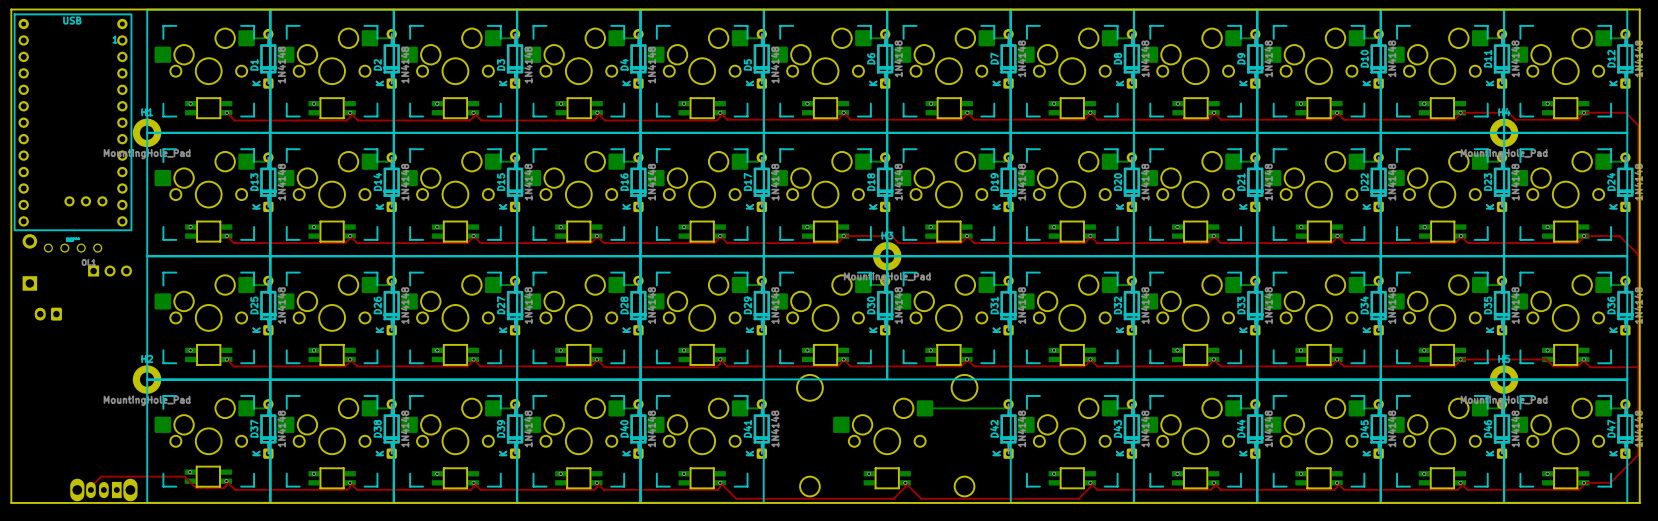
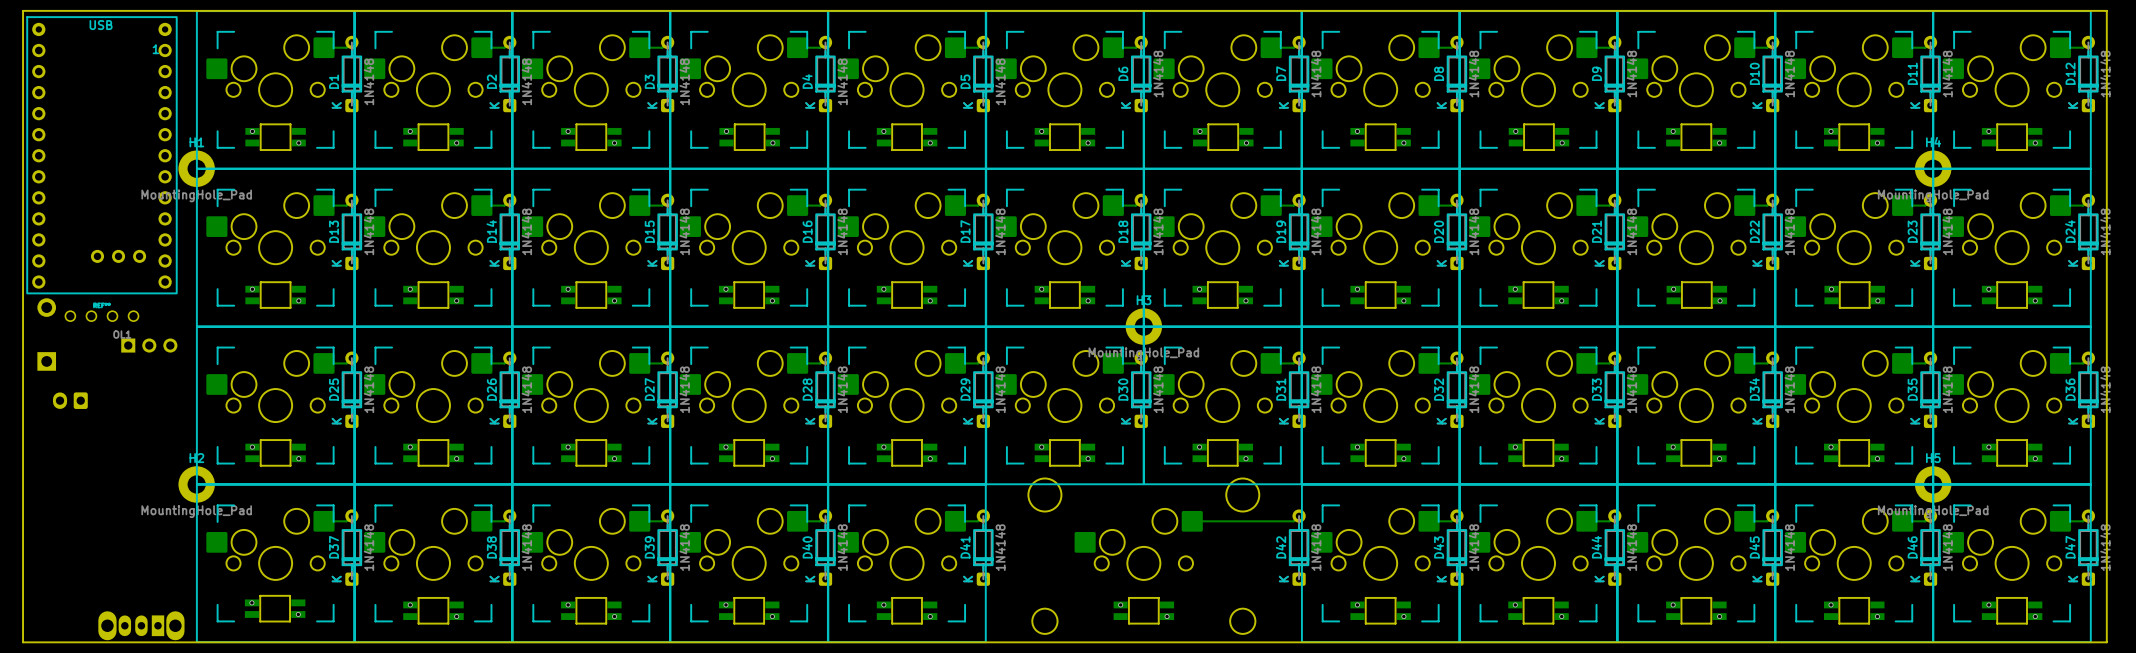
top track: (226, 112) (234, 120) (346, 120) (350, 117) (350, 112) (358, 120) (470, 120) (473, 117) (473, 112) (481, 120) (593, 120) (597, 117) (597, 112) (605, 120) (716, 120) (720, 117) (720, 112) (727, 119) (837, 119) (843, 112) (850, 119) (961, 119) (967, 112) (974, 119) (1084, 119) (1090, 112) (1097, 119) (1208, 119) (1214, 112) (1221, 119) (1331, 119) (1337, 112) (1344, 119) (1454, 119) (1460, 112) (1508, 112) (1515, 119) (1578, 119) (1583, 112) (1625, 112) (1638, 125) (1638, 455) (1610, 482) (1583, 482) (1578, 489) (1467, 489) (1460, 482) (1460, 487) (1457, 489) (1344, 489) (1337, 482) (1337, 487) (1334, 489) (1220, 489) (1213, 482) (1213, 487) (1211, 489) (1097, 489) (1090, 482) (1090, 487) (1078, 498) (921, 498) (905, 482) (905, 487) (893, 498) (736, 498) (720, 482) (720, 487) (717, 489) (603, 489) (596, 482) (596, 487) (594, 489) (480, 489) (473, 482) (473, 487) (470, 489) (357, 489) (350, 482) (350, 487) (347, 489) (235, 489) (226, 481) (226, 485) (223, 488) (196, 488) (184, 476) (101, 476) (90, 486) (90, 490) -> none
top track: (226, 236) (233, 243) (345, 243) (350, 236) (357, 243) (467, 243) (473, 236) (480, 243) (591, 243) (596, 236) (603, 243) (714, 243) (720, 236) (727, 243) (837, 243) (843, 236) (891, 236) (898, 243) (961, 243) (967, 236) (974, 243) (1084, 243) (1090, 236) (1097, 243) (1207, 243) (1213, 236) (1220, 243) (1331, 243) (1337, 236) (1344, 243) (1455, 243) (1460, 236) (1467, 243) (1578, 243) (1583, 236) (1619, 236) (1638, 254) -> none
top track: (226, 359) (233, 366) (345, 366) (350, 359) (357, 366) (467, 366) (473, 359) (480, 366) (591, 366) (596, 359) (604, 367) (716, 367) (720, 363) (720, 359) (727, 366) (837, 366) (843, 359) (850, 366) (961, 366) (967, 359) (974, 366) (1084, 366) (1090, 359) (1097, 366) (1207, 366) (1213, 359) (1220, 366) (1331, 366) (1337, 359) (1344, 366) (1454, 366) (1460, 359) (1546, 359) (1553, 366) (1578, 366) (1583, 360) -> none
top track: (1583, 359) (1590, 367) (1638, 367) -> none

